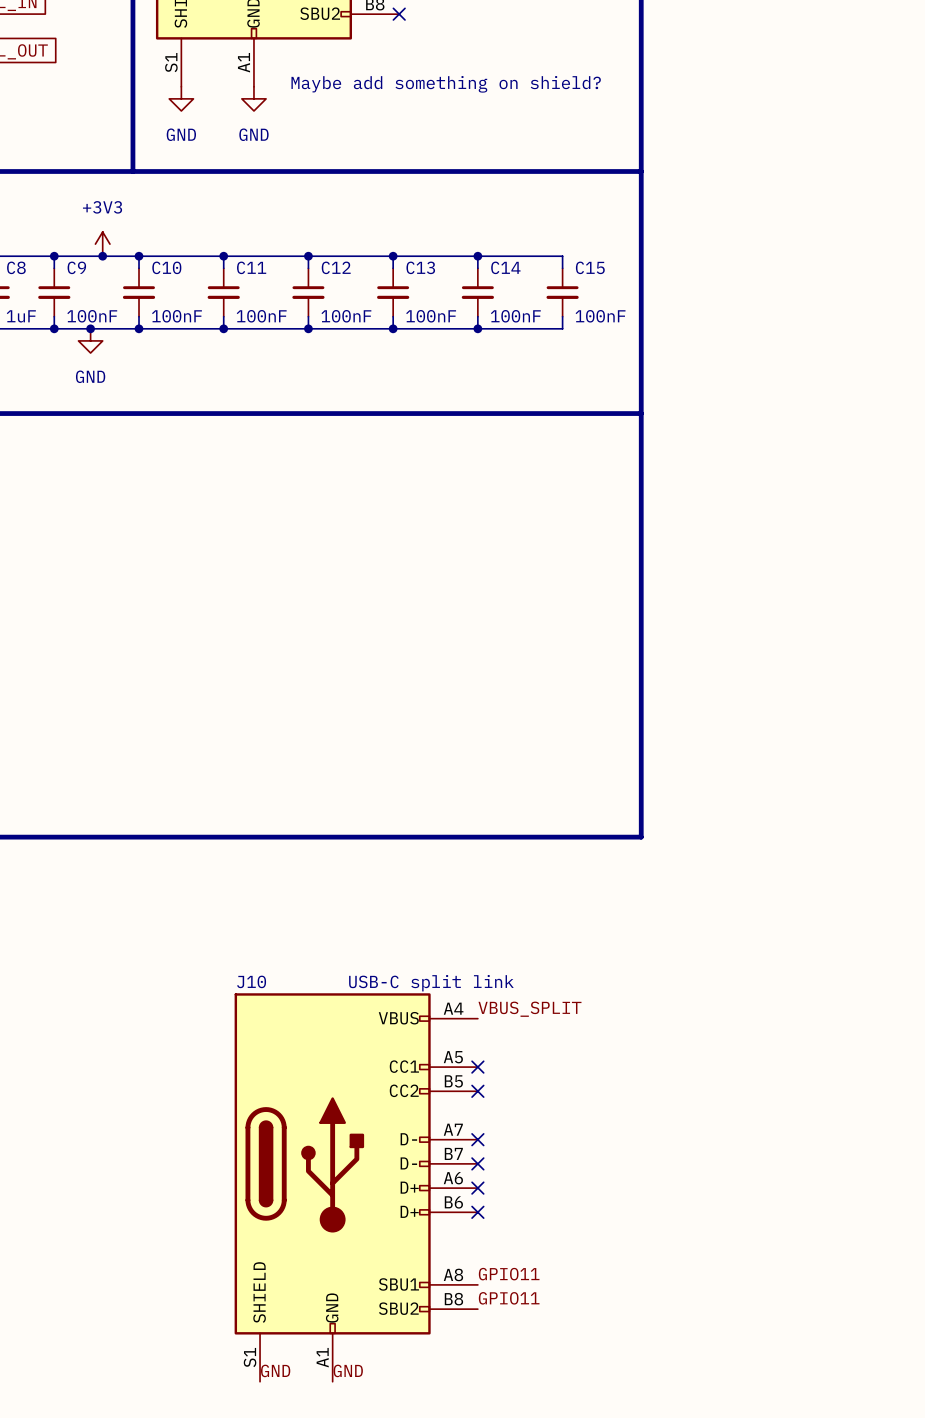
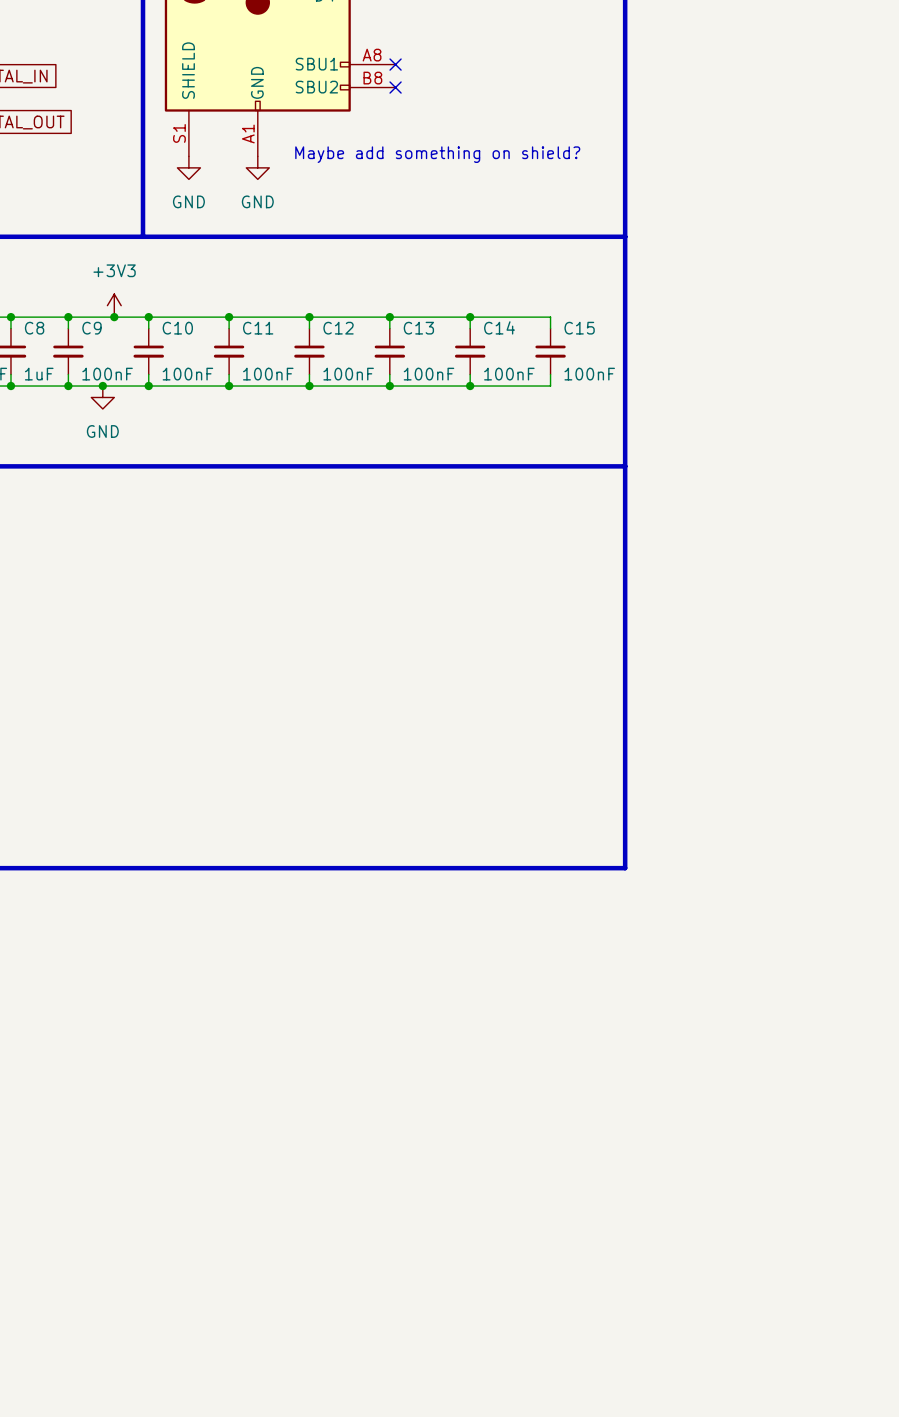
label: VBUS_SPLIT (529, 1009) -> none
no-connect mark: (477, 1067) -> none
no-connect mark: (477, 1091) -> none
no-connect mark: (477, 1139) -> none
no-connect mark: (477, 1163) -> none
J10: USB-C split link (356, 1187) -> none
no-connect mark: (477, 1188) -> none
no-connect mark: (477, 1212) -> none
label: GPIO11 (509, 1274) -> none
label: GPIO11 (509, 1298) -> none
label: GND (275, 1370) -> none
label: GND (348, 1370) -> none

